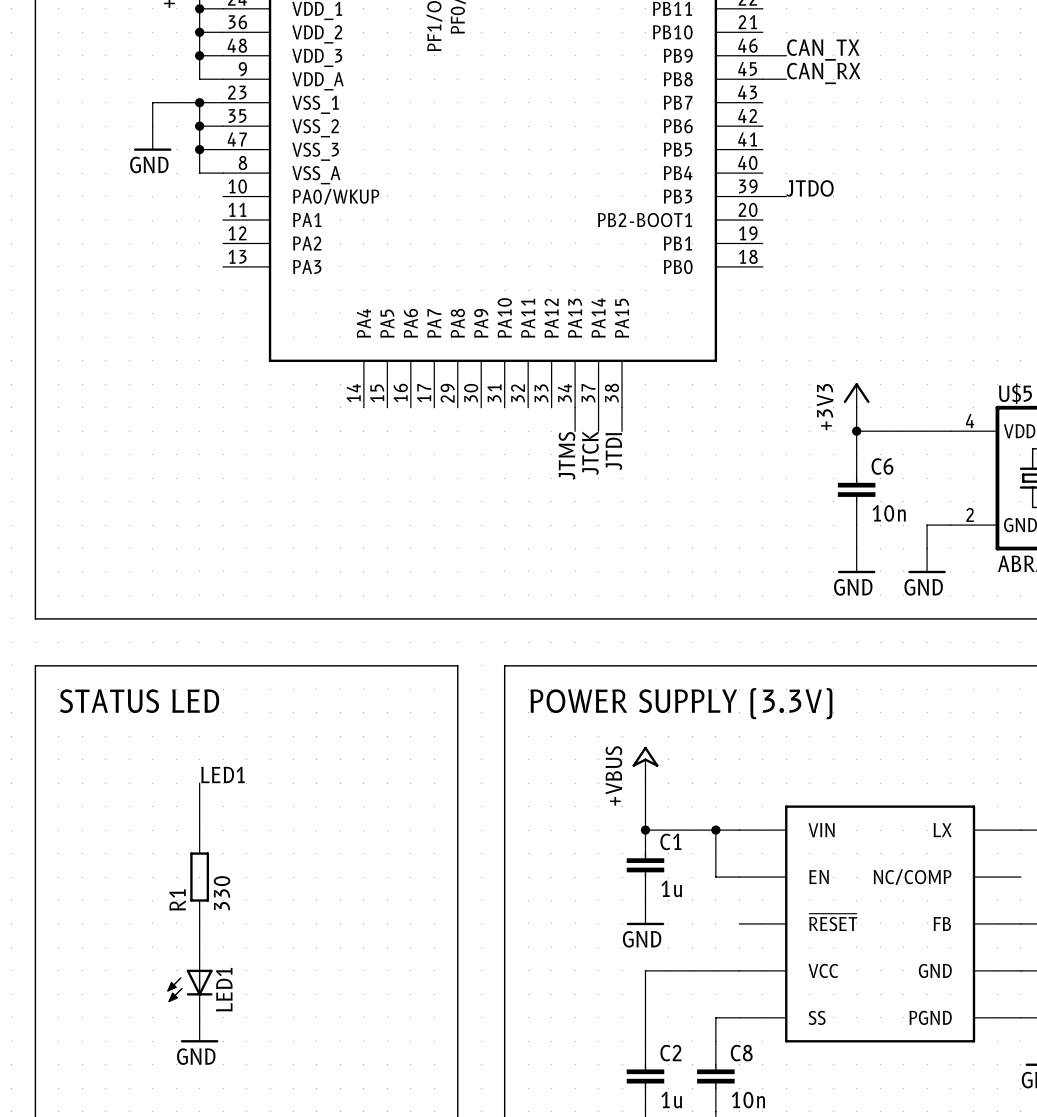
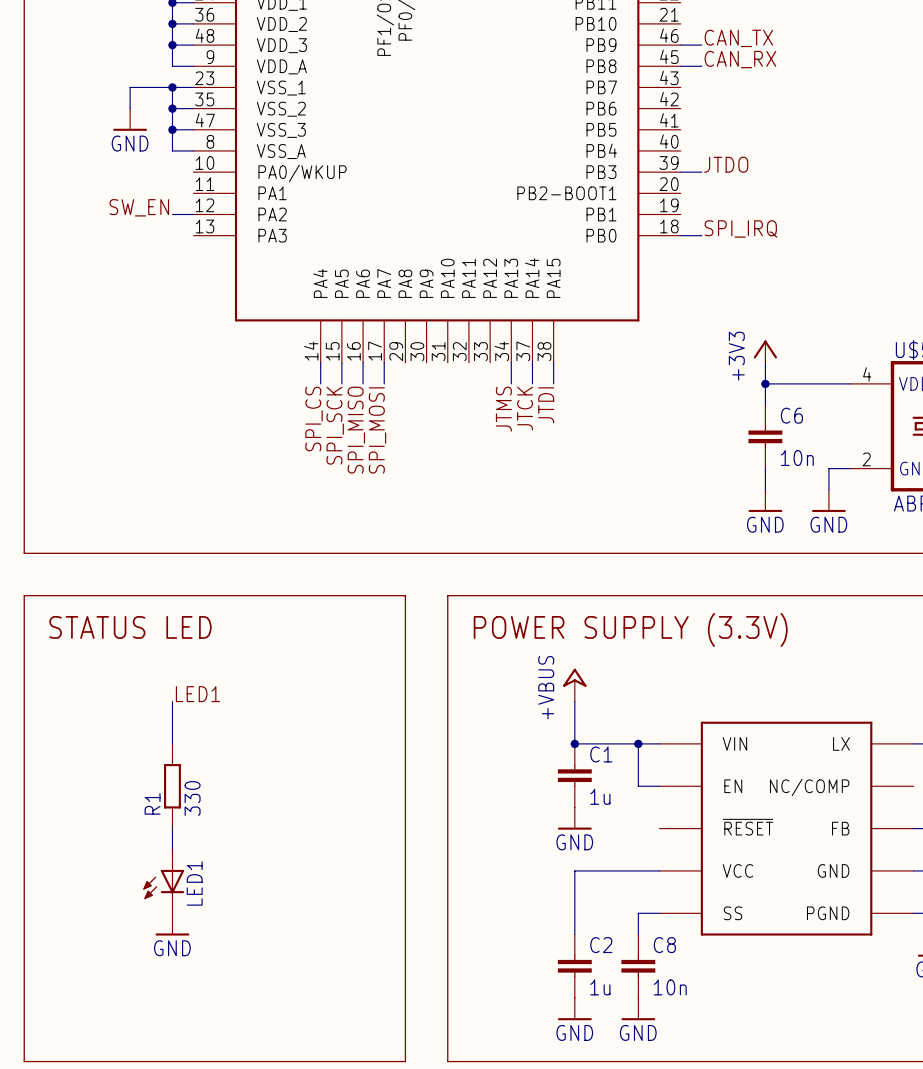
label: none -> SW_EN (139, 207)
wire: none -> (172, 214) (193, 214)
label: none -> SPI_IRQ (741, 228)
wire: none -> (680, 235) (701, 235)
wire: none -> (320, 362) (320, 383)
wire: none -> (341, 362) (341, 383)
wire: none -> (363, 362) (363, 383)
wire: none -> (384, 362) (384, 383)
label: none -> SPI_CS (314, 419)
label: none -> SPI_SCK (335, 425)
label: none -> SPI_MISO (356, 430)
label: none -> SPI_MOSI (377, 430)

